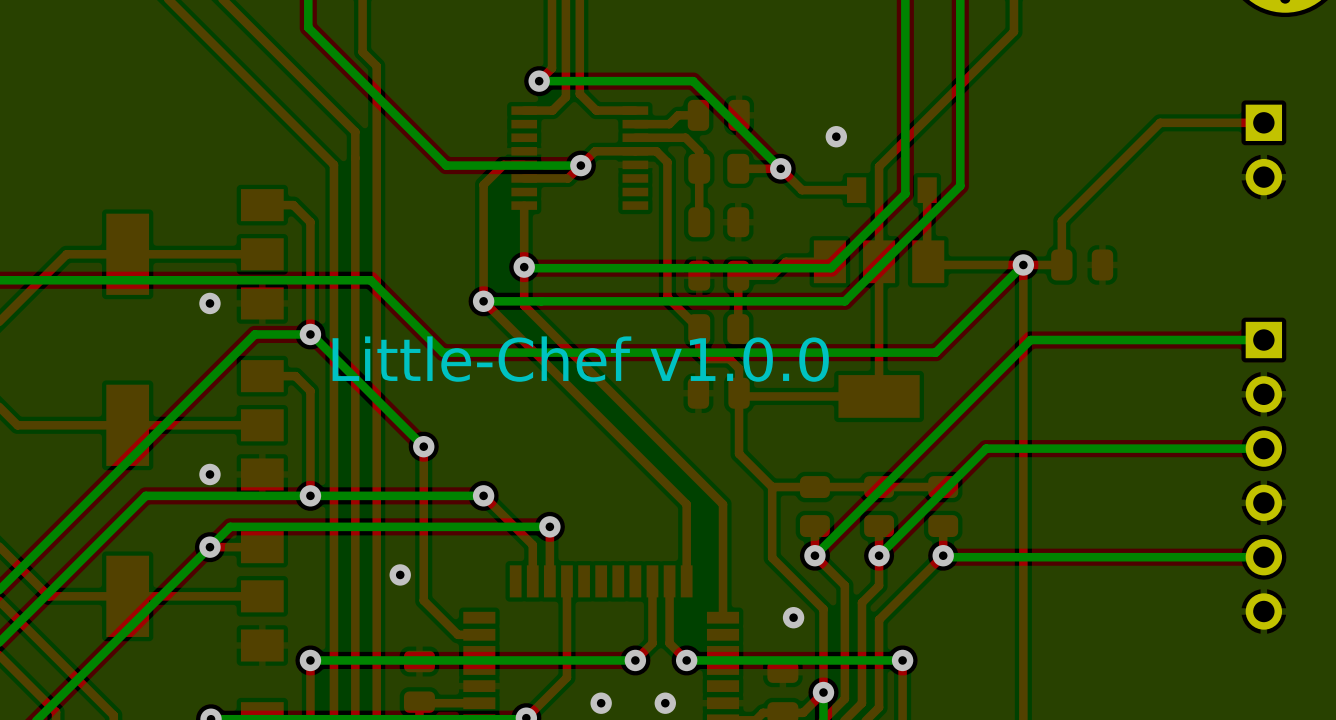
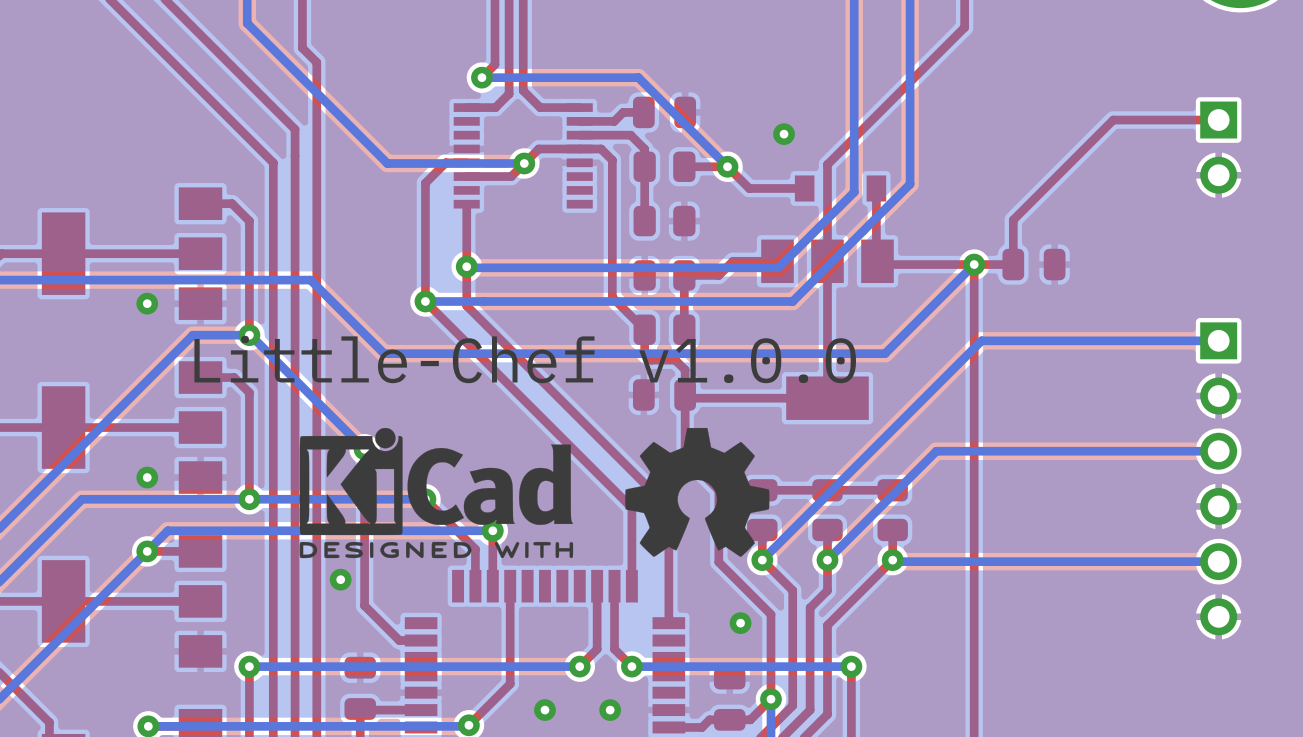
drawing: none -> [299, 427, 574, 559]
drawing: none -> [625, 427, 770, 557]

